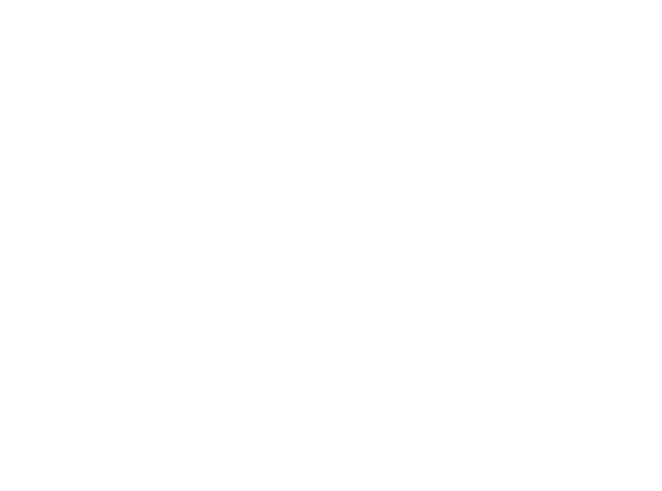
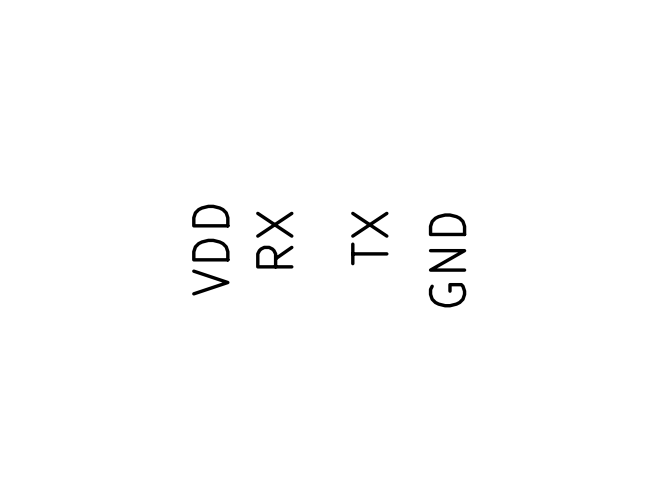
text: none -> TX (369, 238)
text: none -> RX (274, 240)
text: none -> VDD (210, 250)
text: none -> GND (447, 260)

